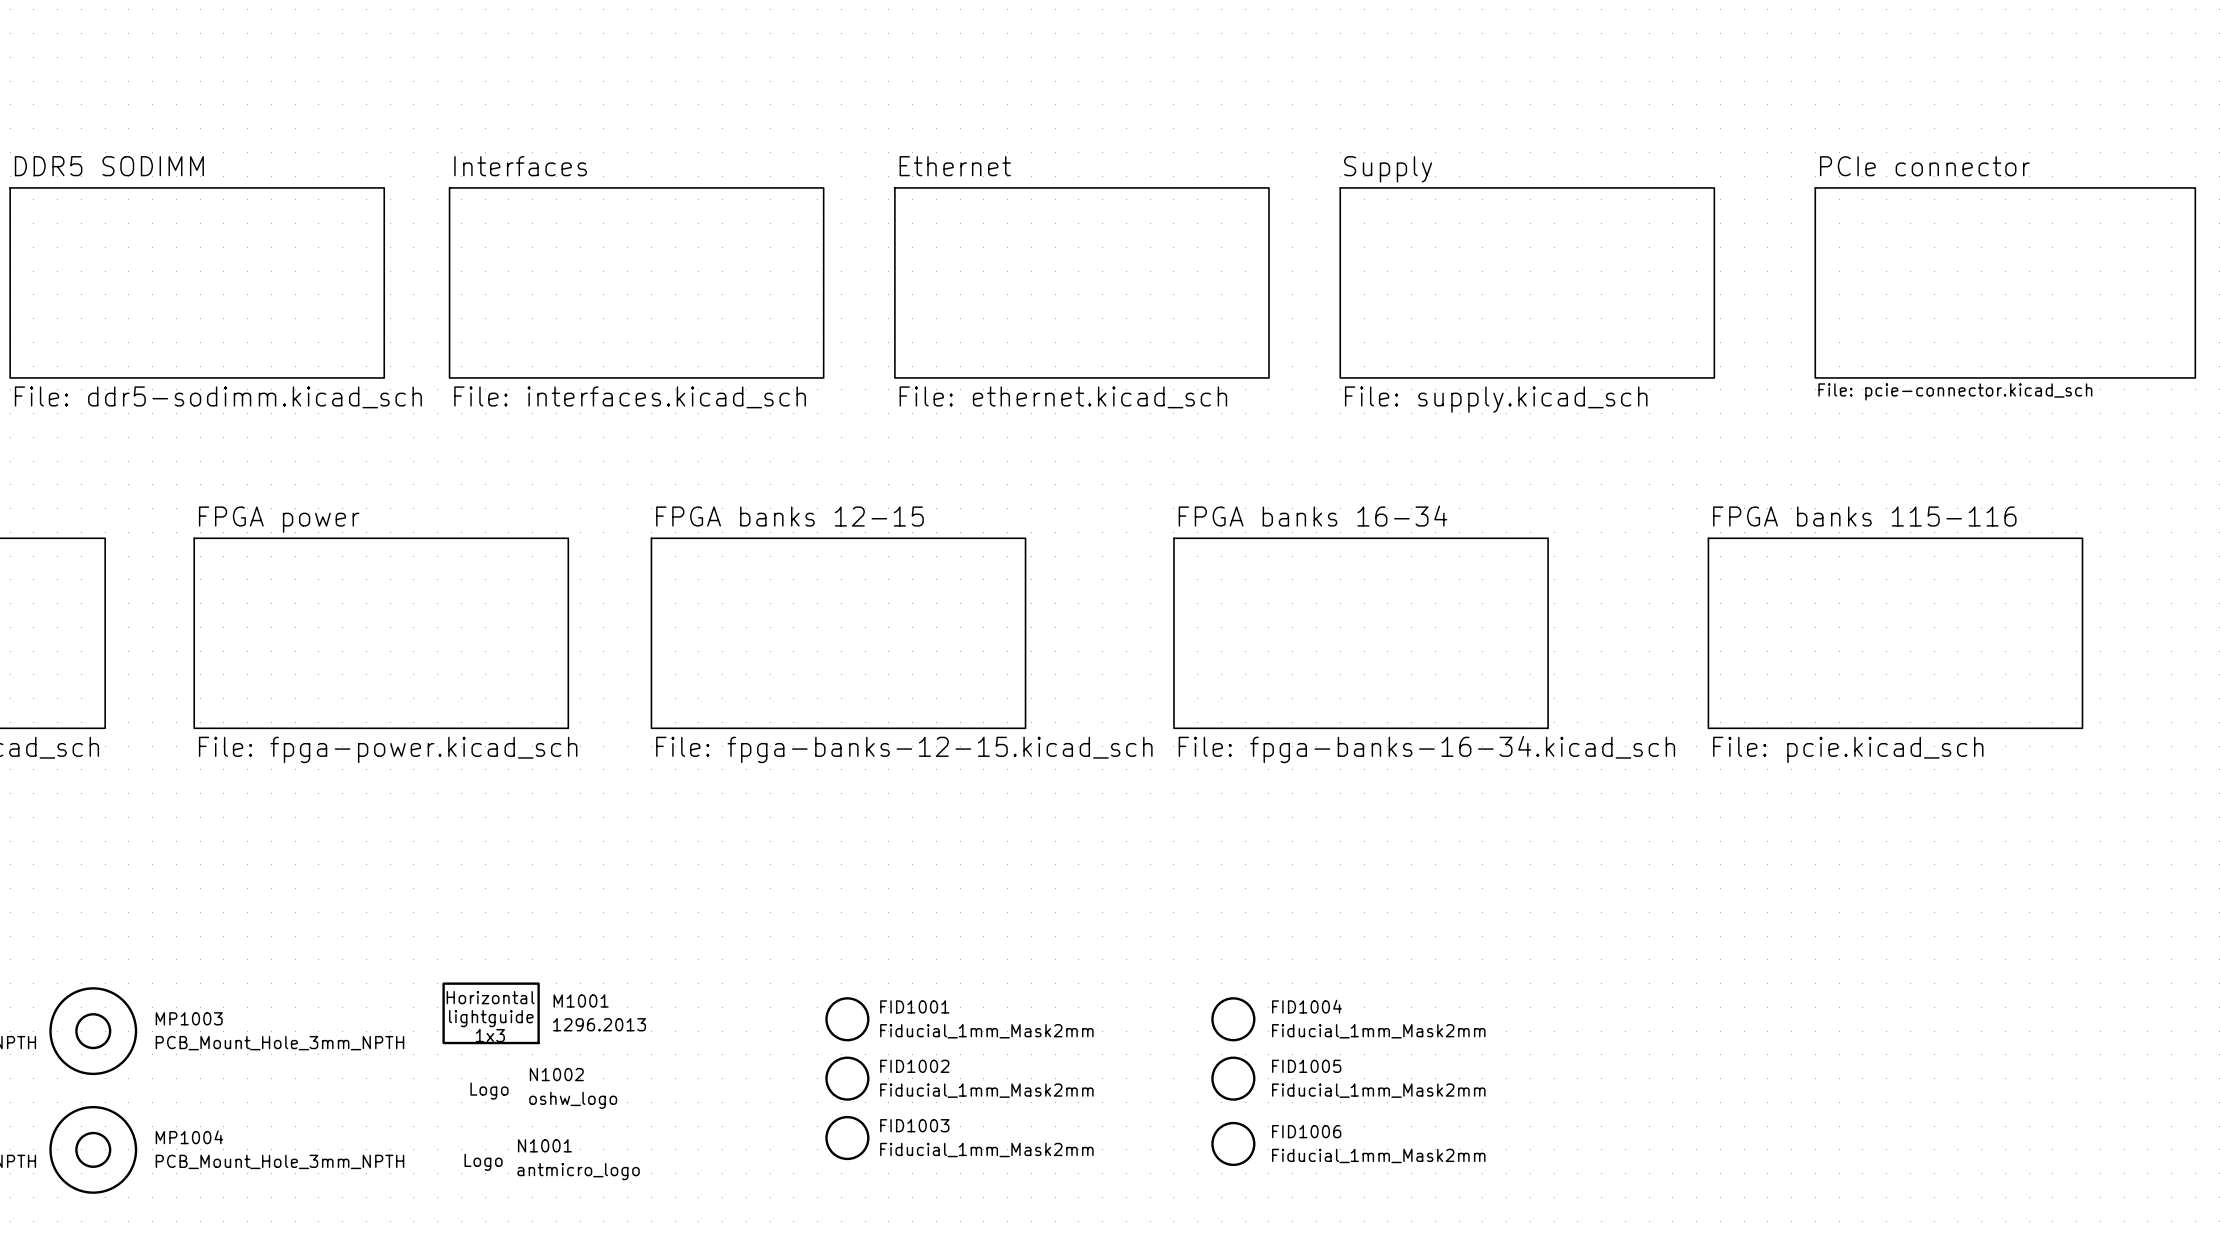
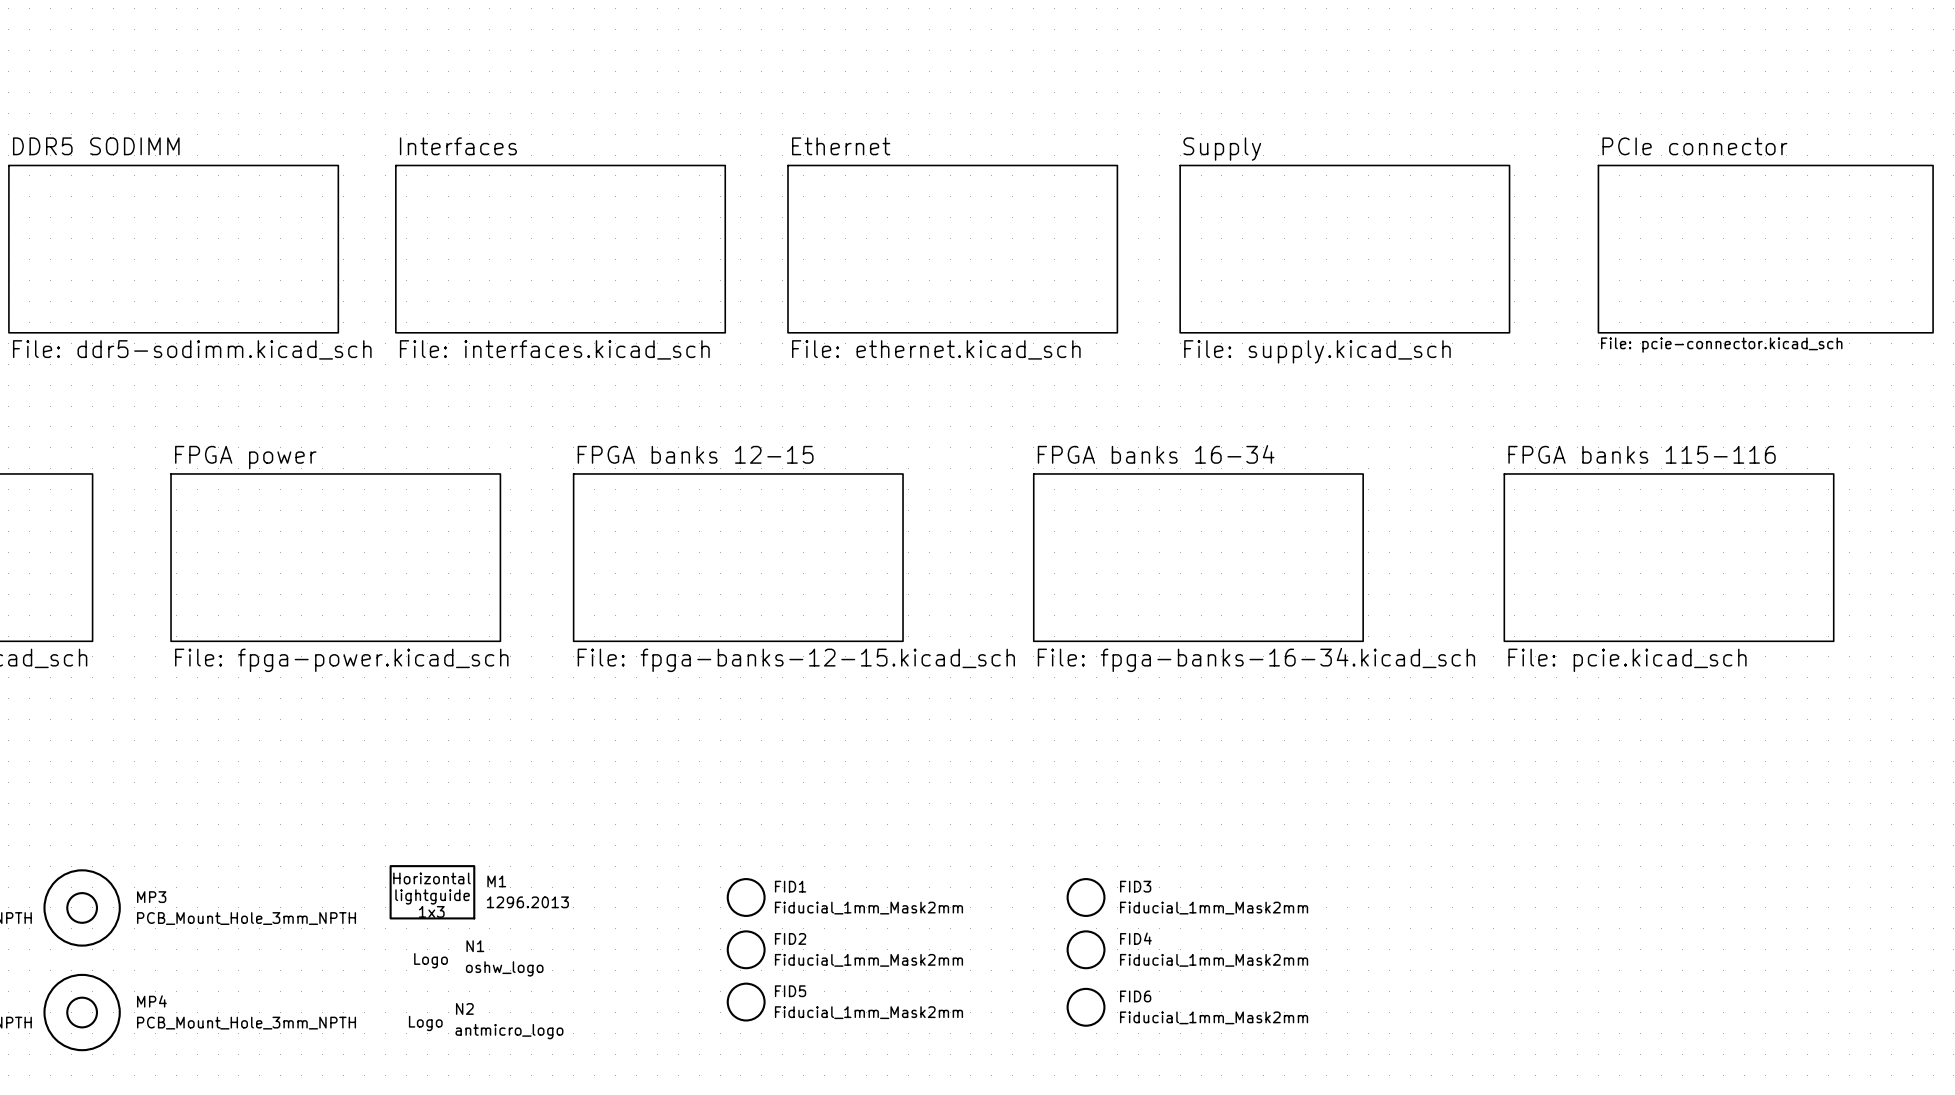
M1001 name: M1001 (581, 1001) -> M1 (496, 881)
FID1001 name: FID1001 (914, 1006) -> FID1 (790, 886)
FID1004 name: FID1004 (1306, 1006) -> FID3 (1135, 886)
MP1003 name: MP1003 (189, 1018) -> MP3 (151, 897)
FID1002 name: FID1002 (914, 1066) -> FID2 (790, 938)
FID1005 name: FID1005 (1306, 1066) -> FID4 (1135, 938)
N1002 name: N1002 (556, 1074) -> N1 (475, 946)
FID1003 name: FID1003 (914, 1125) -> FID5 (790, 991)
FID1006 name: FID1006 (1306, 1131) -> FID6 (1135, 996)
MP1004 name: MP1004 (189, 1137) -> MP4 (151, 1001)
N1001 name: N1001 (544, 1145) -> N2 (464, 1008)

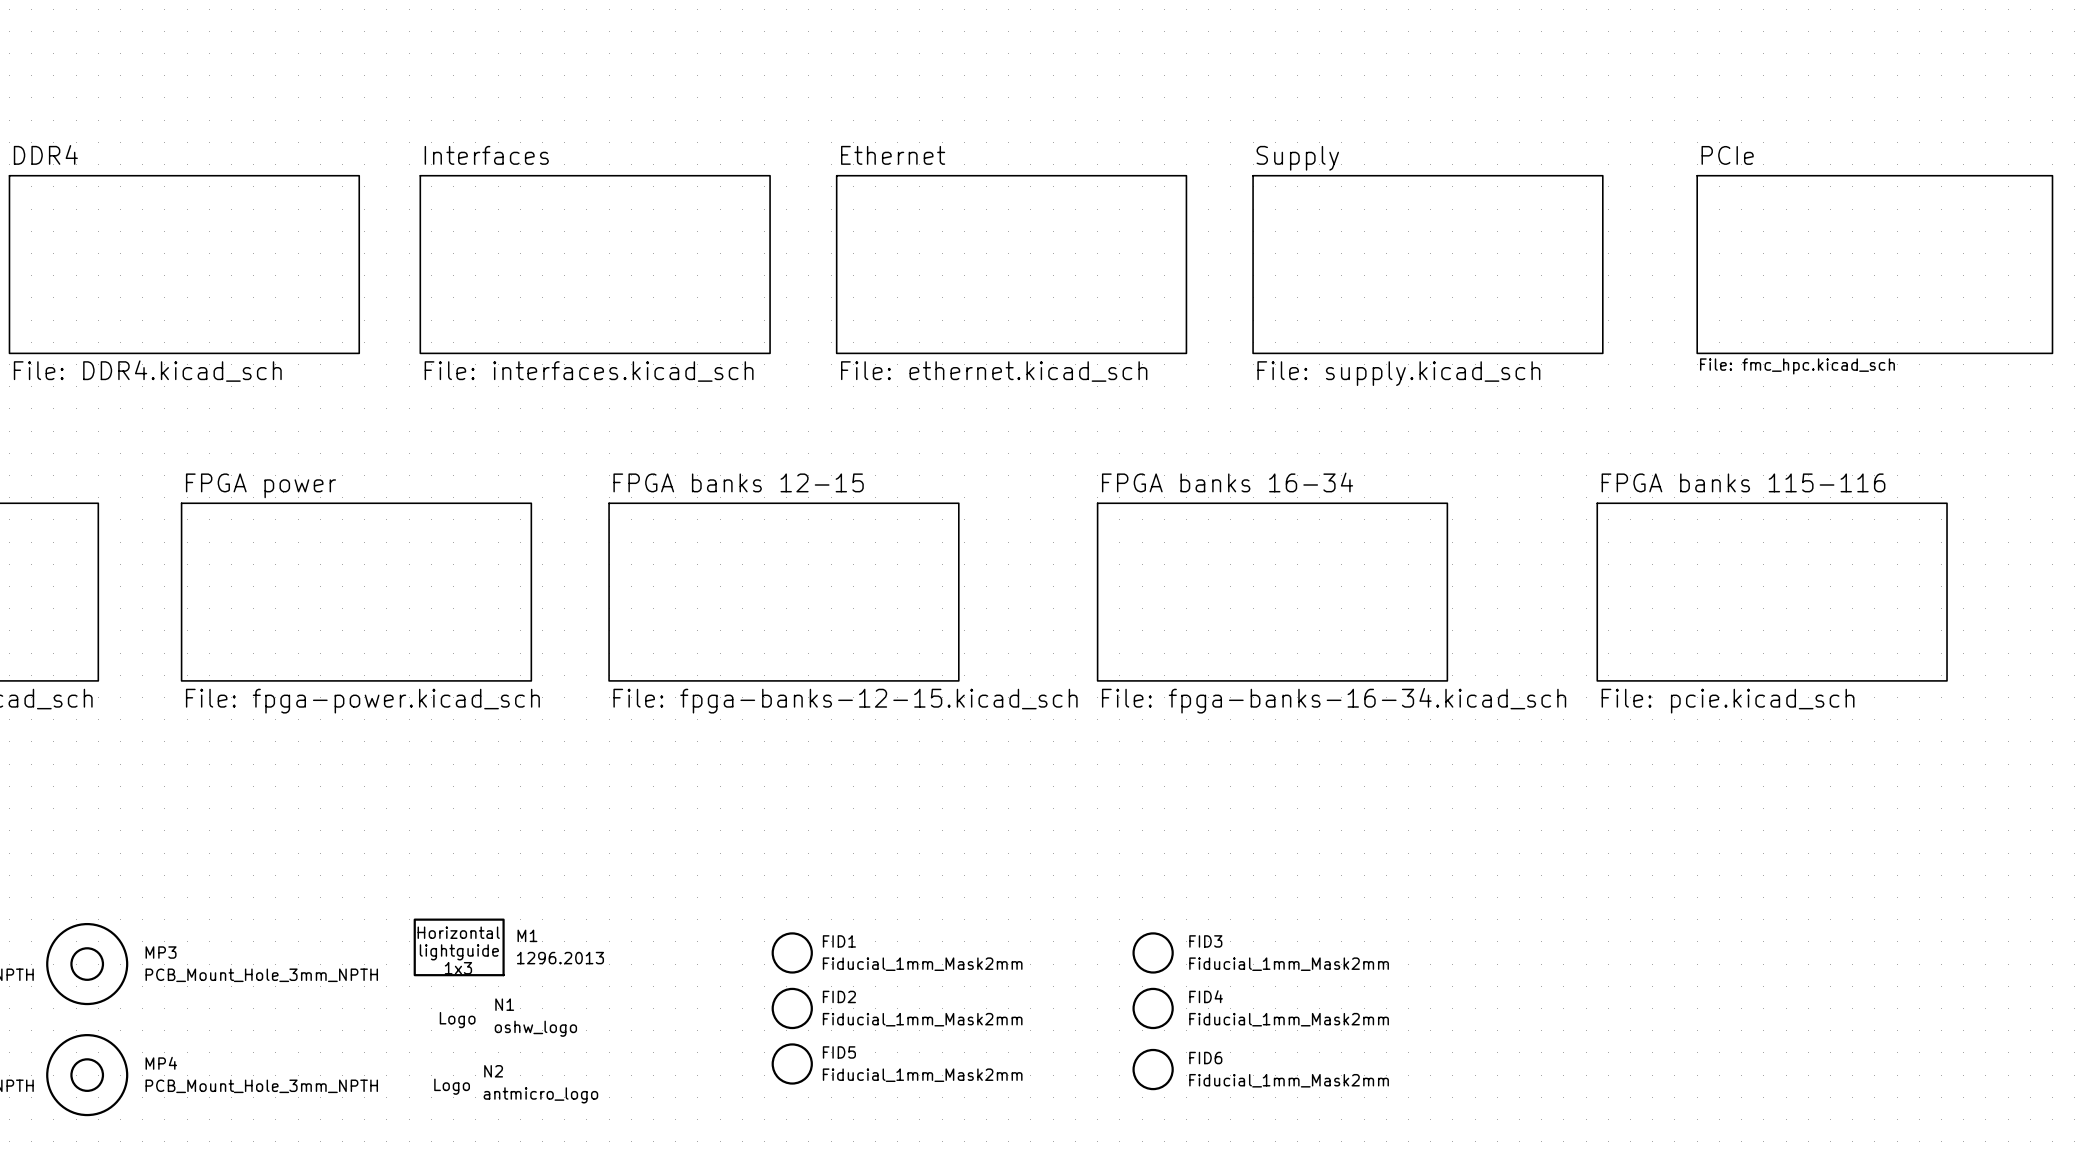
sheet DDR5 SODIMM name: DDR5 SODIMM (96, 146) -> DDR4 (45, 154)
sheet PCIe connector name: PCIe connector (1694, 146) -> PCIe (1727, 155)
sheet PCIe connector value: File: pcie-connector.kicad_sch (1721, 345) -> File: fmc_hpc.kicad_sch (1797, 366)
sheet DDR5 SODIMM value: File: ddr5-sodimm.kicad_sch (192, 349) -> File: DDR4.kicad_sch (147, 371)

